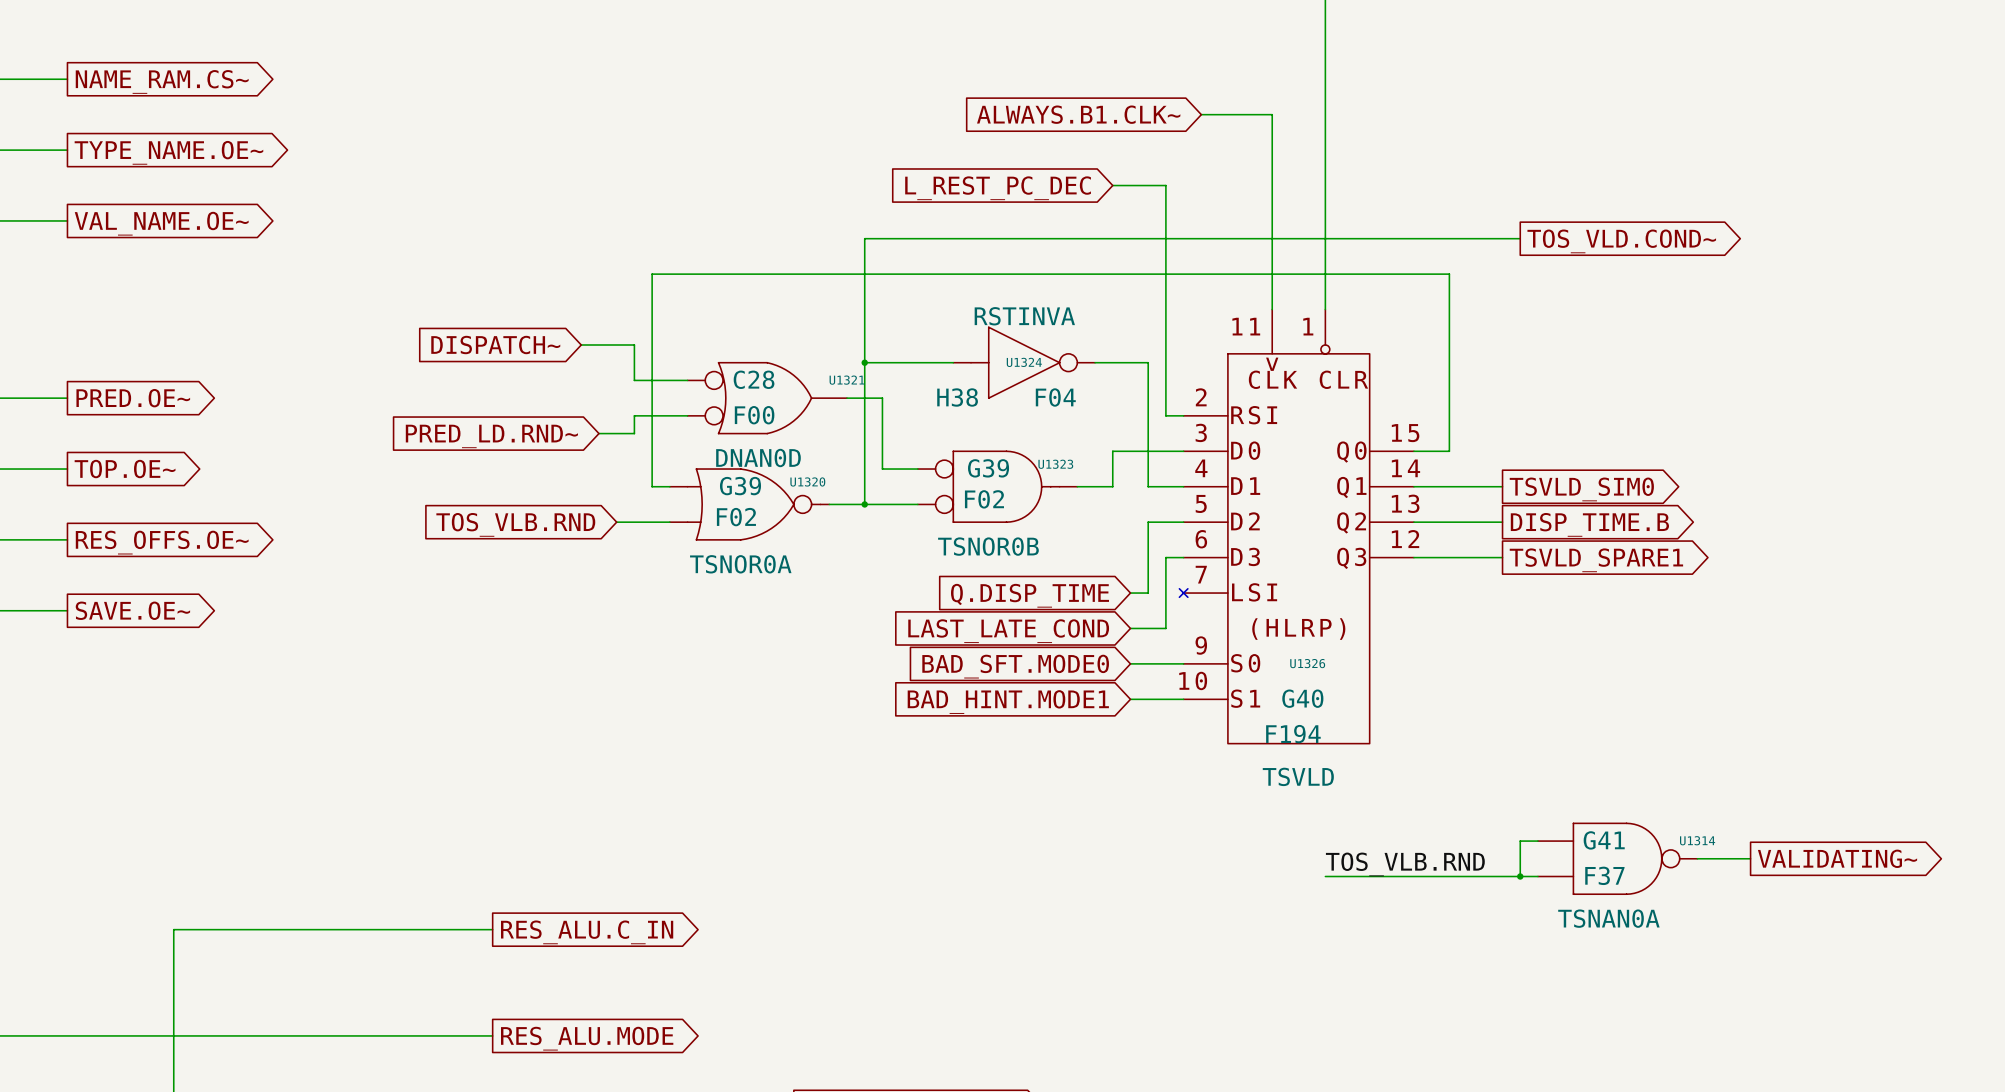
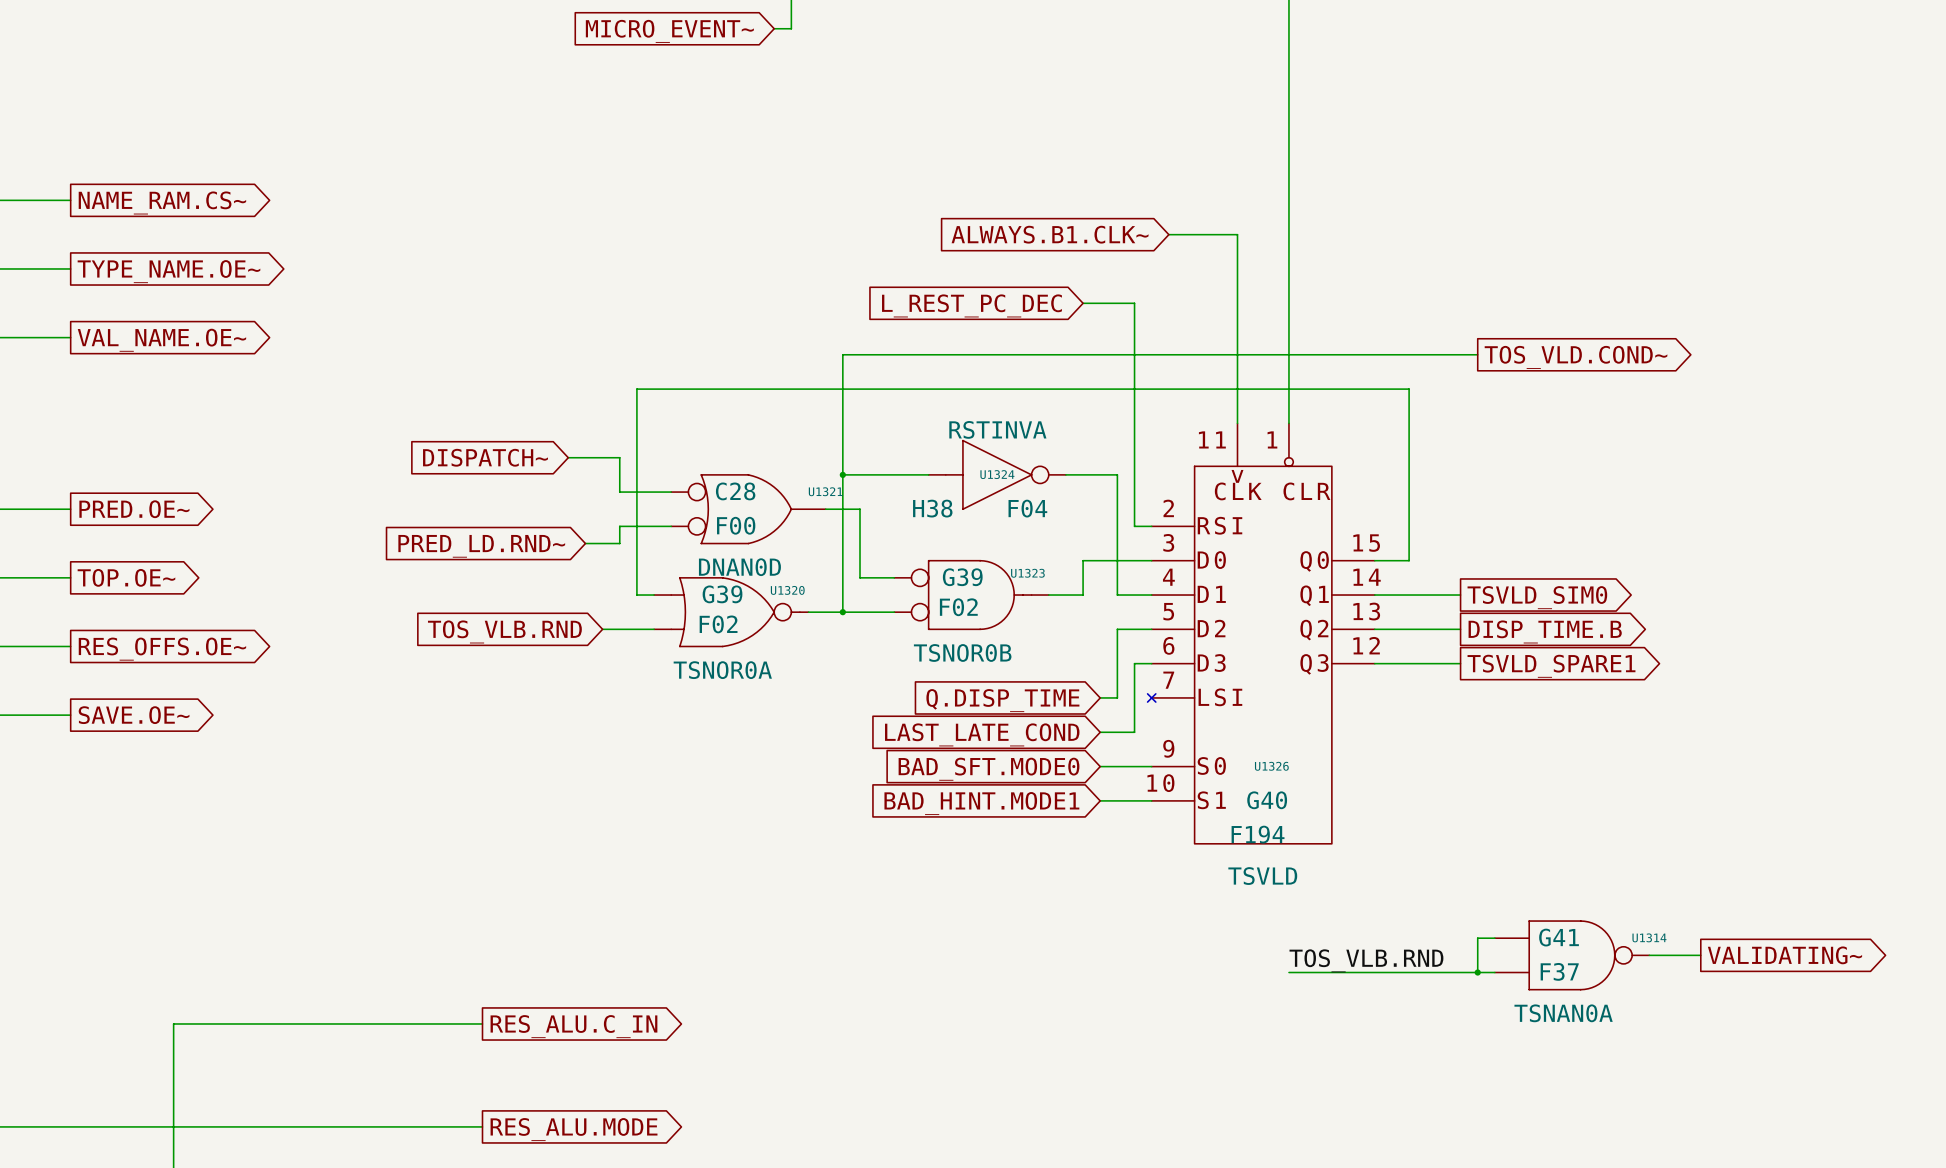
U1326 text: H (1272, 627) -> none
U1326 text: L (1290, 627) -> none
U1326 text: R (1308, 627) -> none
U1326 text: P (1325, 627) -> none
U1326 text: ( (1254, 629) -> none
U1326 text: ) (1342, 629) -> none

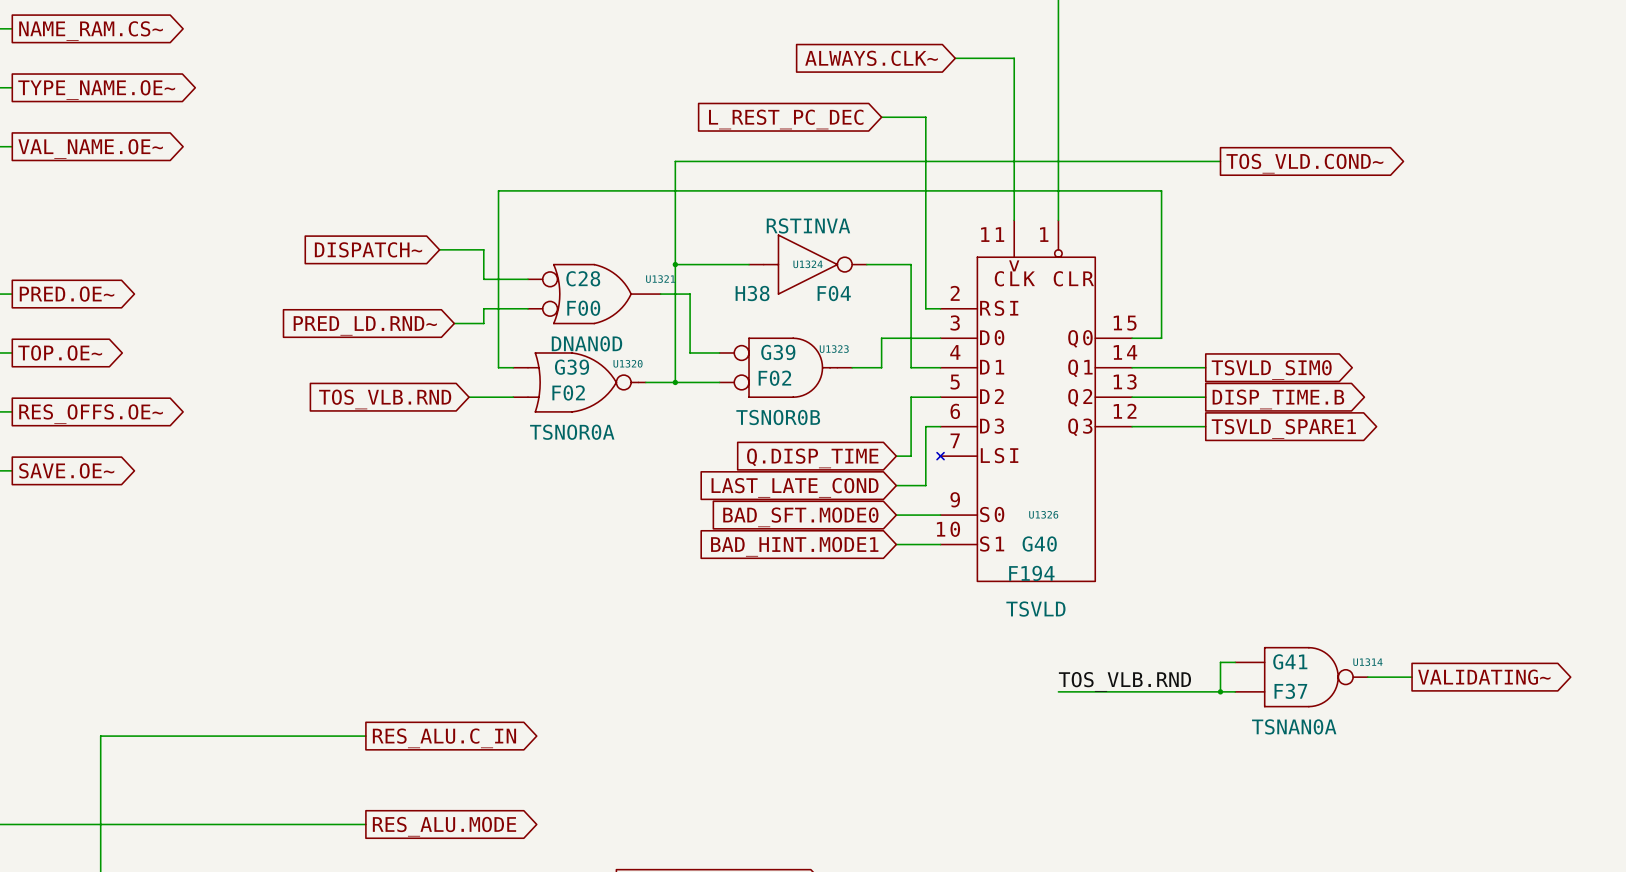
global label: ALWAYS.B1.CLK~ (1050, 234) -> ALWAYS.CLK~ (871, 58)

